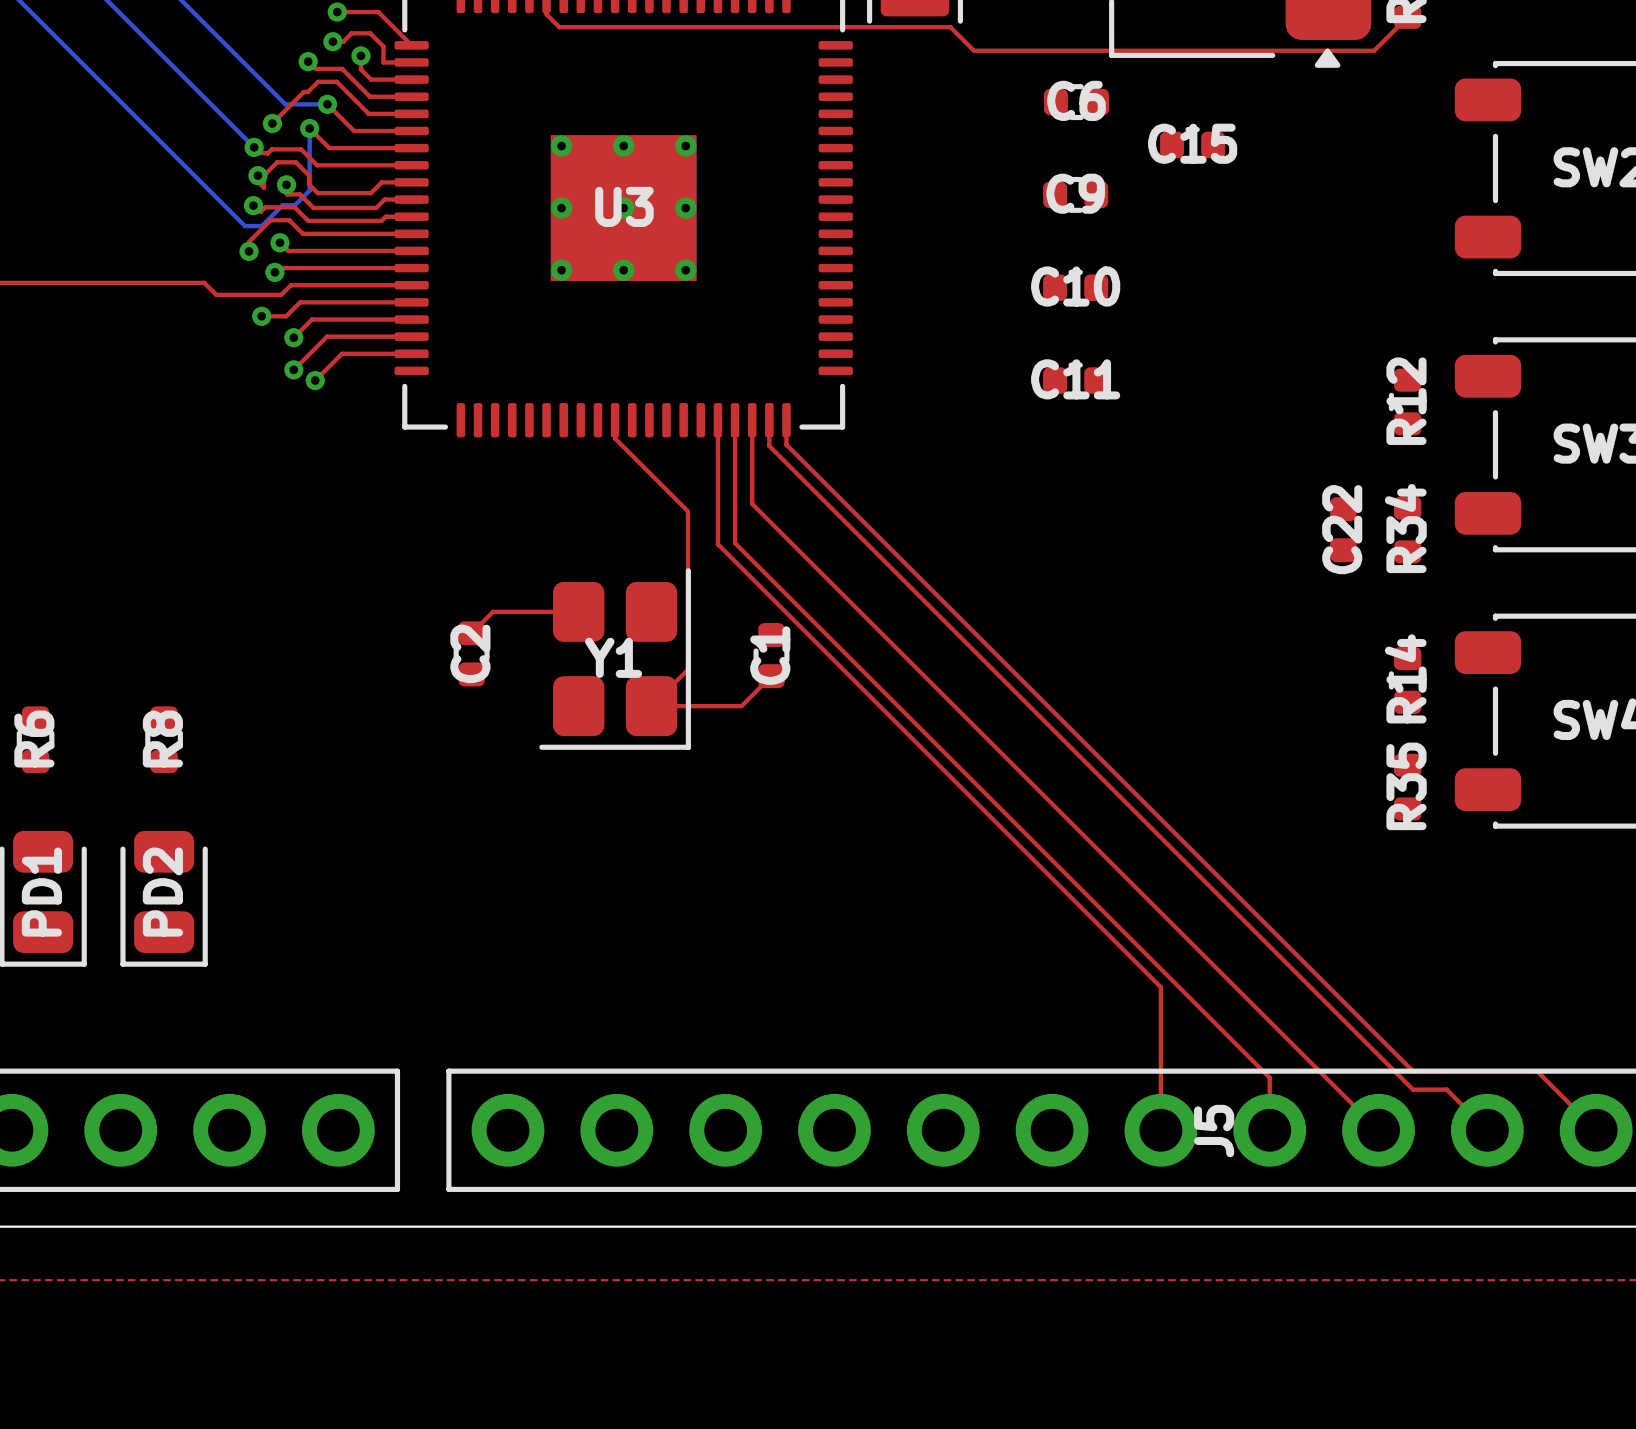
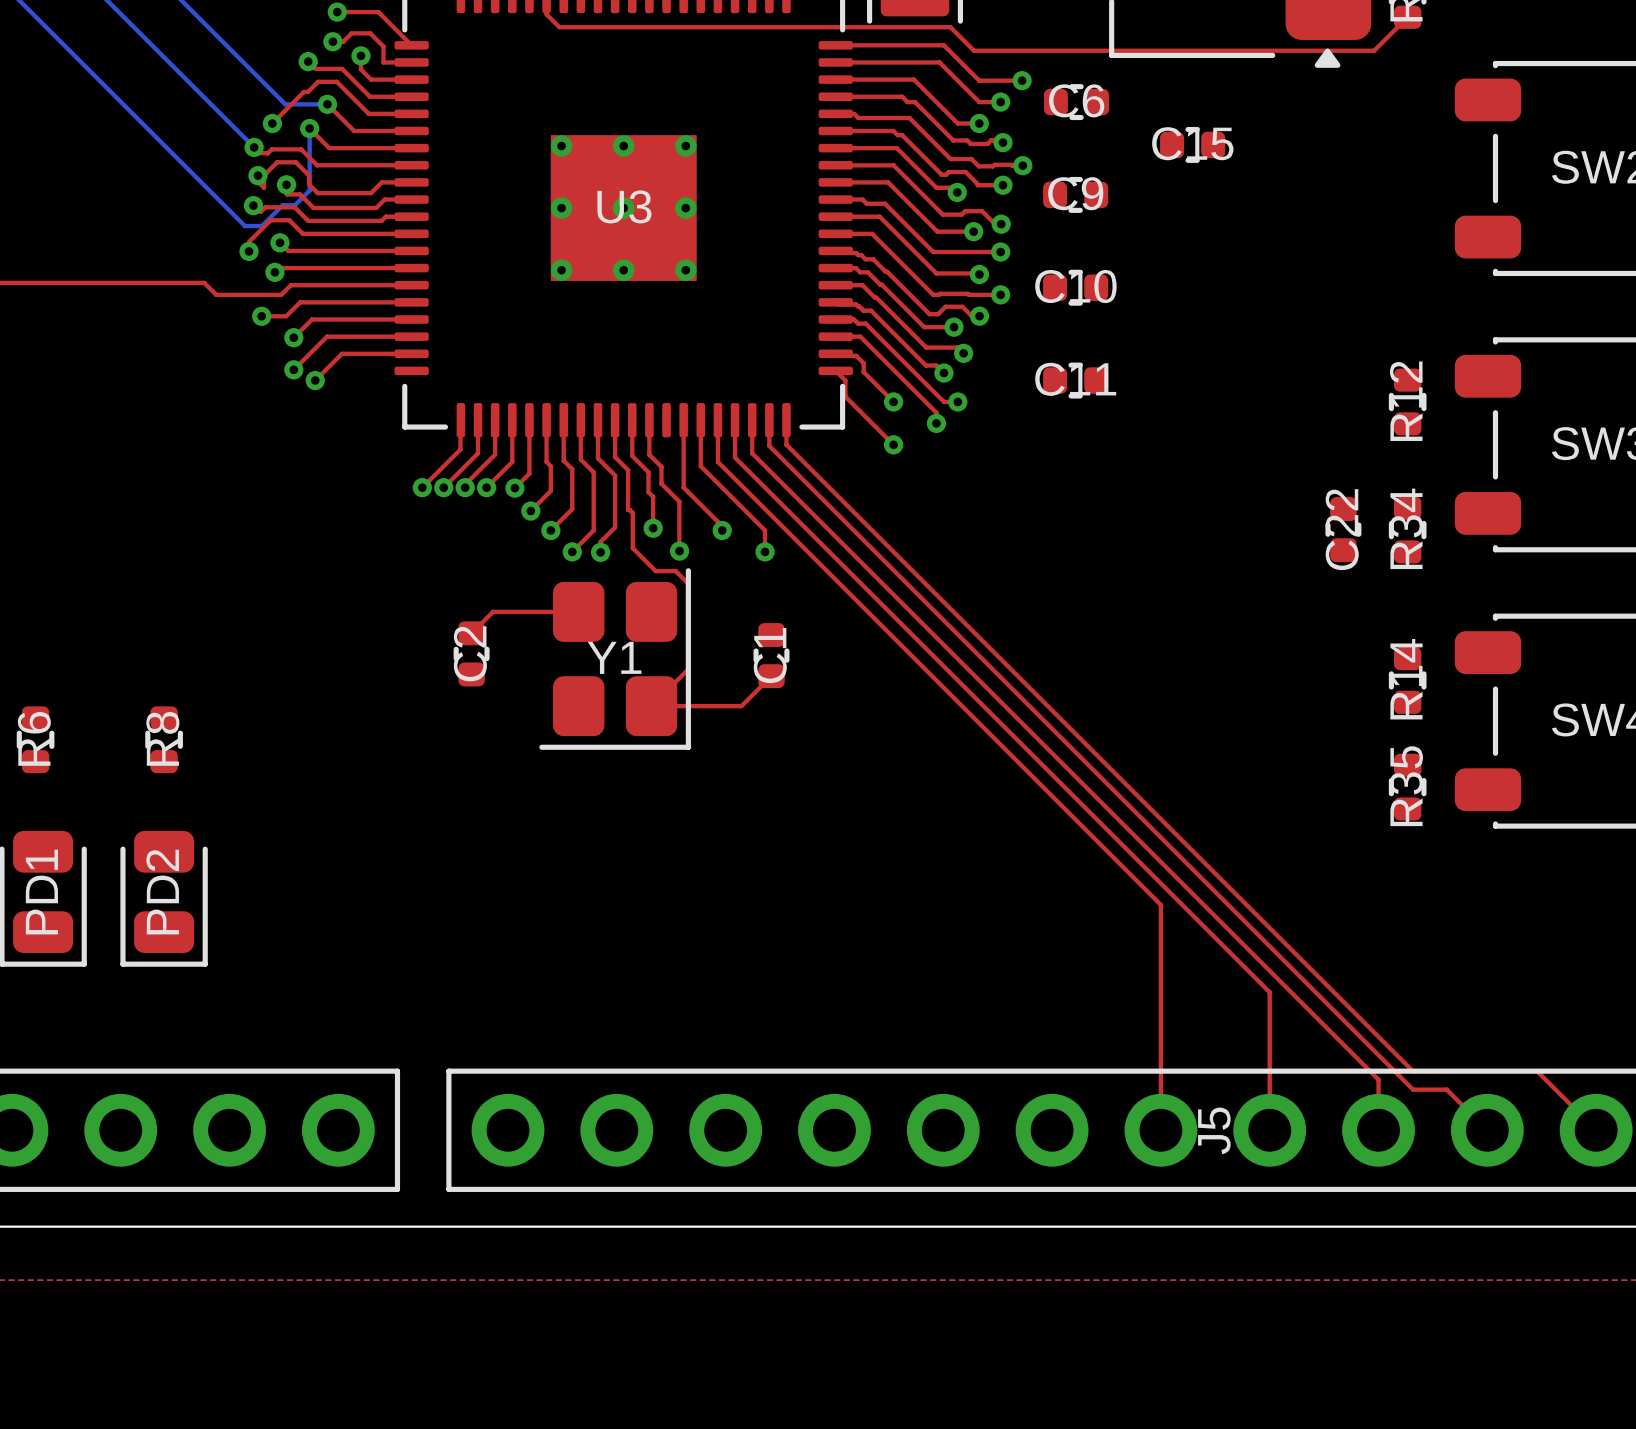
top track: none -> (835, 45) (943, 45) (979, 80) (1022, 80)
top track: none -> (835, 62) (939, 62) (979, 102) (1000, 102)
top track: none -> (835, 79) (913, 79) (957, 123) (979, 123)
via: none -> (1022, 80)
top track: none -> (835, 96) (902, 96) (907, 102) (915, 102) (953, 140) (967, 140) (970, 143) (987, 143) (991, 140) (994, 140) (999, 144) (1002, 142)
via: none -> (1000, 102)
top track: none -> (837, 115) (835, 113) (854, 113) (858, 118) (909, 118) (950, 159) (971, 159) (978, 166) (1022, 165)
via: none -> (979, 123)
top track: none -> (835, 131) (893, 131) (897, 135) (902, 135) (941, 174) (946, 174) (948, 172) (965, 172) (977, 185) (1002, 185)
via: none -> (1002, 142)
top track: none -> (835, 148) (896, 148) (936, 187) (952, 187) (957, 192)
top track: none -> (835, 165) (893, 165) (942, 214) (961, 214) (965, 211) (982, 211) (995, 224) (1001, 224)
via: none -> (1022, 165)
top track: none -> (835, 182) (888, 182) (937, 231) (973, 231)
via: none -> (1002, 185)
via: none -> (957, 192)
top track: none -> (835, 199) (862, 199) (866, 203) (885, 203) (933, 252) (1000, 252)
top track: none -> (835, 216) (879, 216) (936, 273) (979, 274)
via: none -> (1001, 224)
via: none -> (973, 231)
top track: none -> (835, 233) (872, 233) (933, 294) (1000, 294)
top track: none -> (835, 250) (849, 250) (861, 255) (865, 259) (873, 259) (929, 314) (938, 314) (945, 306) (962, 306) (971, 316) (979, 316)
via: none -> (1000, 252)
top track: none -> (835, 268) (855, 268) (860, 272) (867, 272) (924, 327) (953, 327)
via: none -> (979, 274)
top track: none -> (835, 285) (862, 285) (926, 347) (957, 347) (963, 353)
via: none -> (1000, 294)
top track: none -> (834, 300) (838, 304) (856, 304) (863, 310) (871, 310) (925, 365) (936, 365) (943, 373)
via: none -> (979, 316)
top track: none -> (835, 319) (853, 319) (858, 323) (865, 323) (944, 401) (957, 401)
via: none -> (953, 327)
top track: none -> (835, 336) (860, 336) (936, 412) (936, 423)
top track: none -> (835, 353) (856, 355) (863, 363) (863, 372) (893, 401)
via: none -> (963, 353)
top track: none -> (835, 370) (845, 380) (845, 396) (893, 444)
via: none -> (943, 373)
via: none -> (893, 401)
via: none -> (957, 401)
top track: none -> (460, 420) (460, 449) (422, 487)
top track: none -> (478, 420) (478, 453) (443, 487)
top track: none -> (495, 420) (495, 454) (465, 484)
top track: none -> (512, 420) (512, 461) (486, 487)
top track: none -> (529, 420) (529, 473) (514, 488)
top track: none -> (546, 420) (546, 461) (550, 466) (550, 490) (530, 511)
top track: none -> (563, 420) (563, 460) (572, 469) (572, 509) (550, 530)
top track: none -> (580, 420) (580, 459) (593, 472) (593, 530) (572, 551)
top track: none -> (597, 420) (597, 458) (615, 475) (615, 527) (600, 541) (600, 552)
top track: none -> (632, 420) (632, 455) (648, 472) (648, 492) (653, 496) (653, 528)
top track: none -> (649, 420) (649, 454) (661, 466) (661, 483) (679, 501) (679, 550)
top track: none -> (683, 420) (683, 487) (722, 526)
top track: none -> (700, 420) (700, 466) (765, 530) (765, 551)
via: none -> (936, 423)
top track: (615, 438) (688, 511) (688, 583) -> (615, 438) (615, 457) (628, 470) (628, 510) (632, 512) (632, 548) (655, 571) (675, 571) (688, 583)
via: none -> (893, 444)
top track: (752, 453) (752, 503) (1378, 1130) -> (752, 453) (1378, 1079) (1378, 1130)
top track: (735, 457) (735, 543) (1269, 1077) -> (735, 457) (1269, 992) (1269, 1077)
top track: (717, 461) (717, 544) (1160, 987) -> (717, 461) (1160, 904) (1160, 987)
via: none -> (422, 487)
via: none -> (443, 487)
via: none -> (465, 487)
via: none -> (486, 487)
via: none -> (514, 488)
via: none -> (530, 511)
via: none -> (653, 528)
via: none -> (550, 530)
via: none -> (722, 530)
via: none -> (572, 551)
via: none -> (679, 551)
via: none -> (765, 551)
via: none -> (600, 552)

